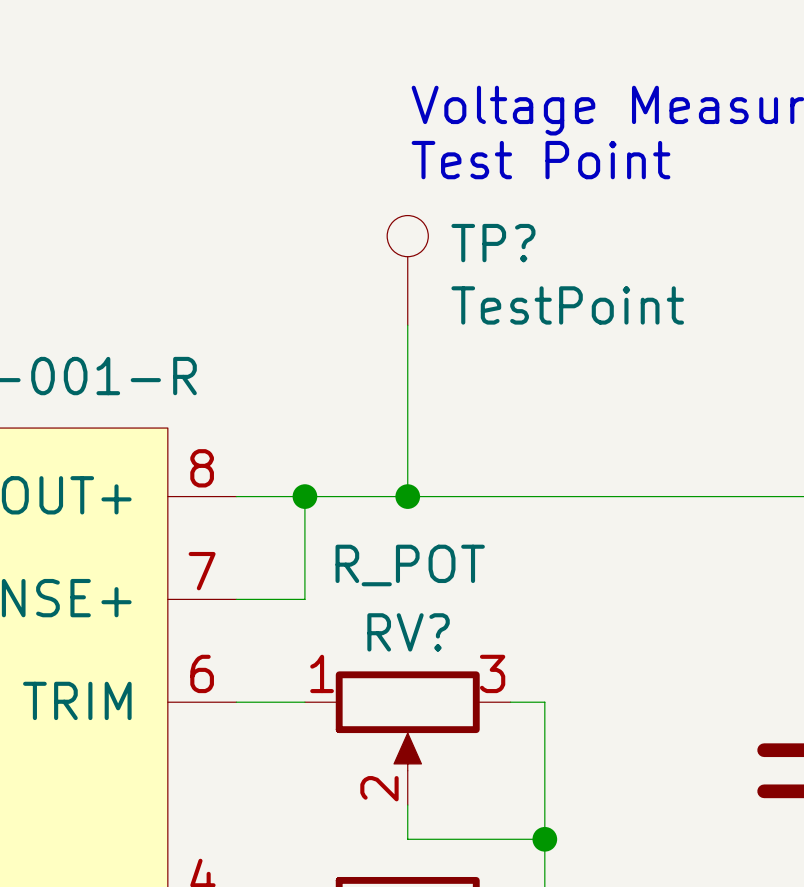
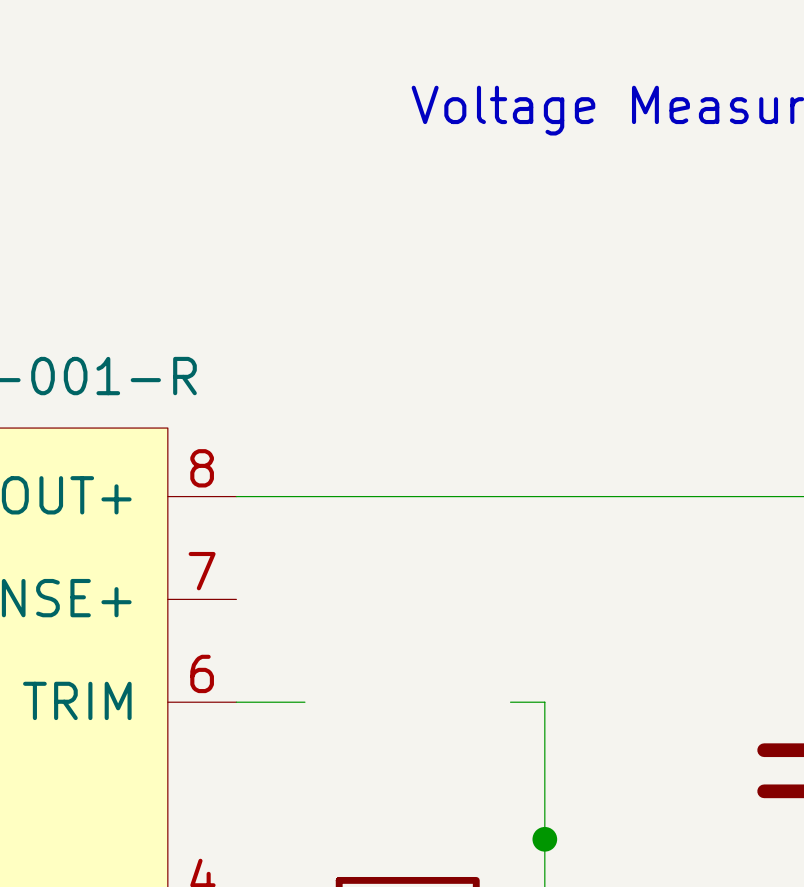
text: Test Point (541, 160) -> none
TP?: TestPoint (407, 270) -> none
wire: (407, 325) (407, 496) -> none
wire: (304, 496) (304, 599) (236, 599) -> none
junction: (304, 496) -> none
junction: (407, 496) -> none
RV?: R_POT (407, 738) -> none
wire: (407, 805) (407, 839) (544, 839) -> none

